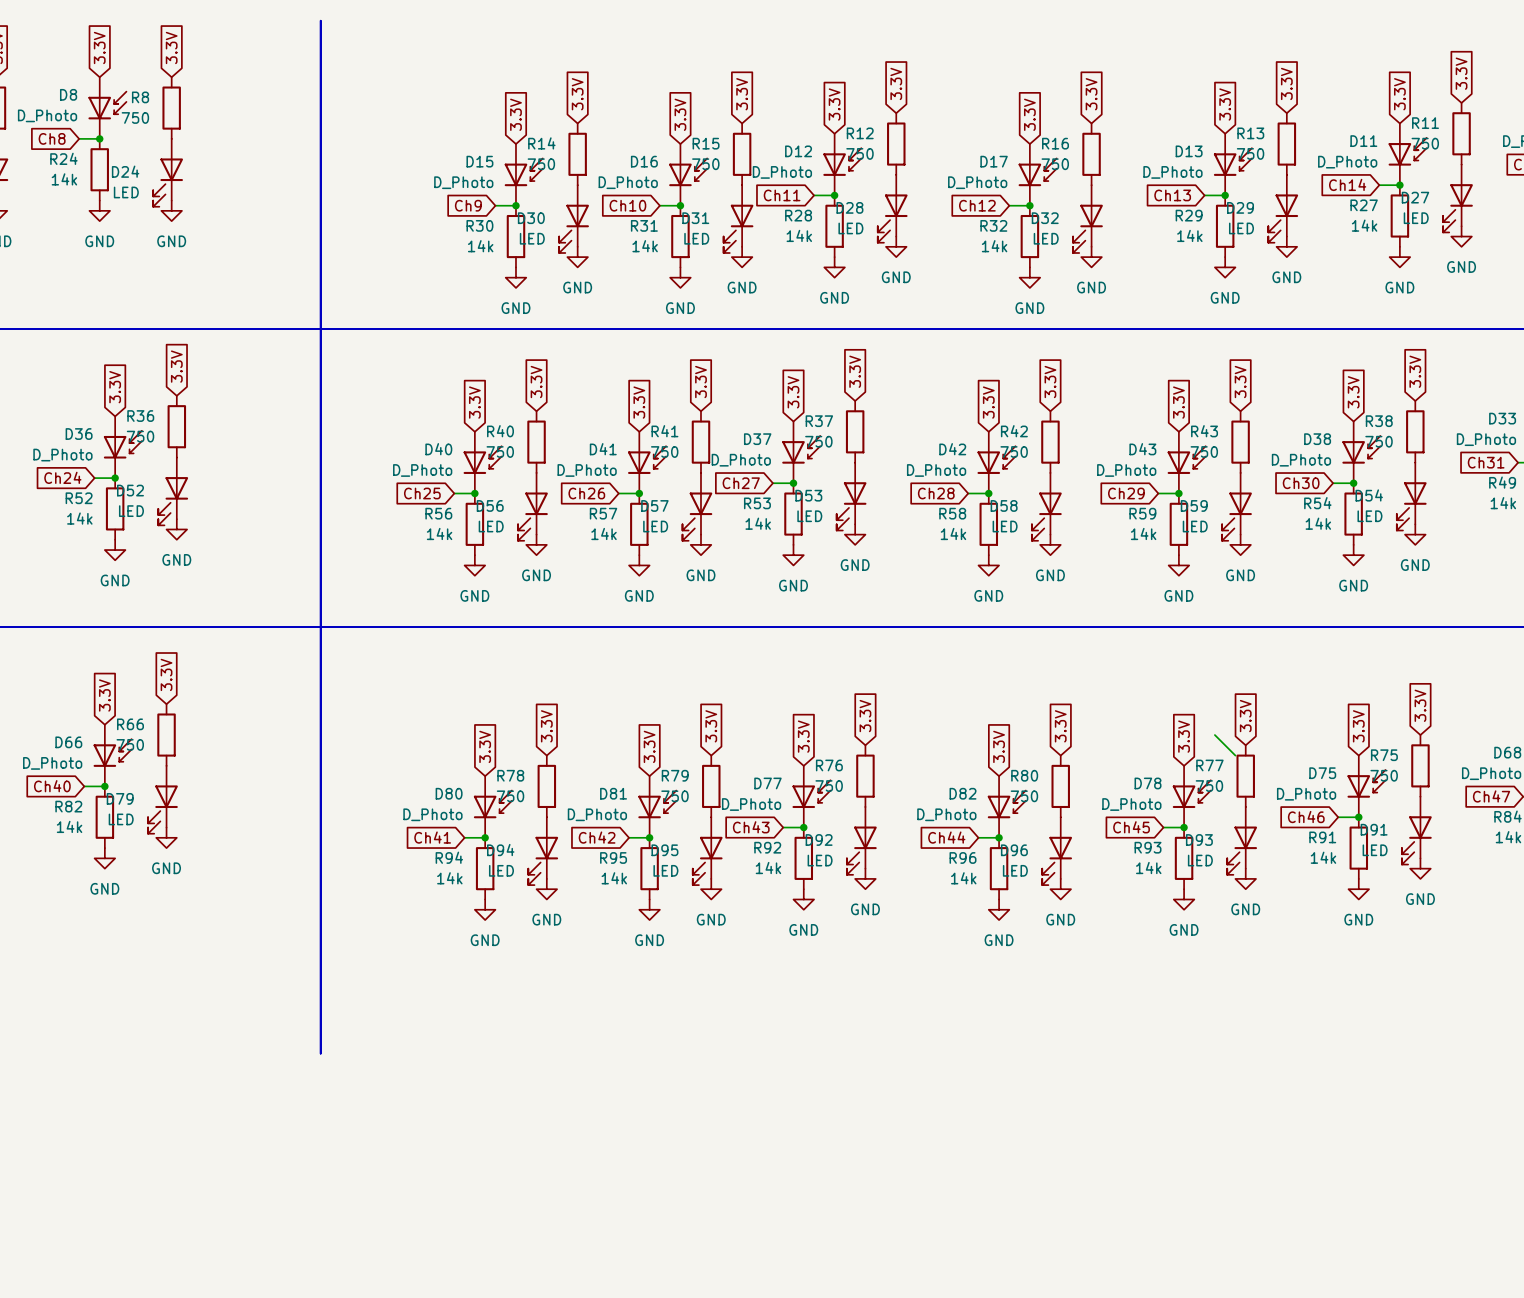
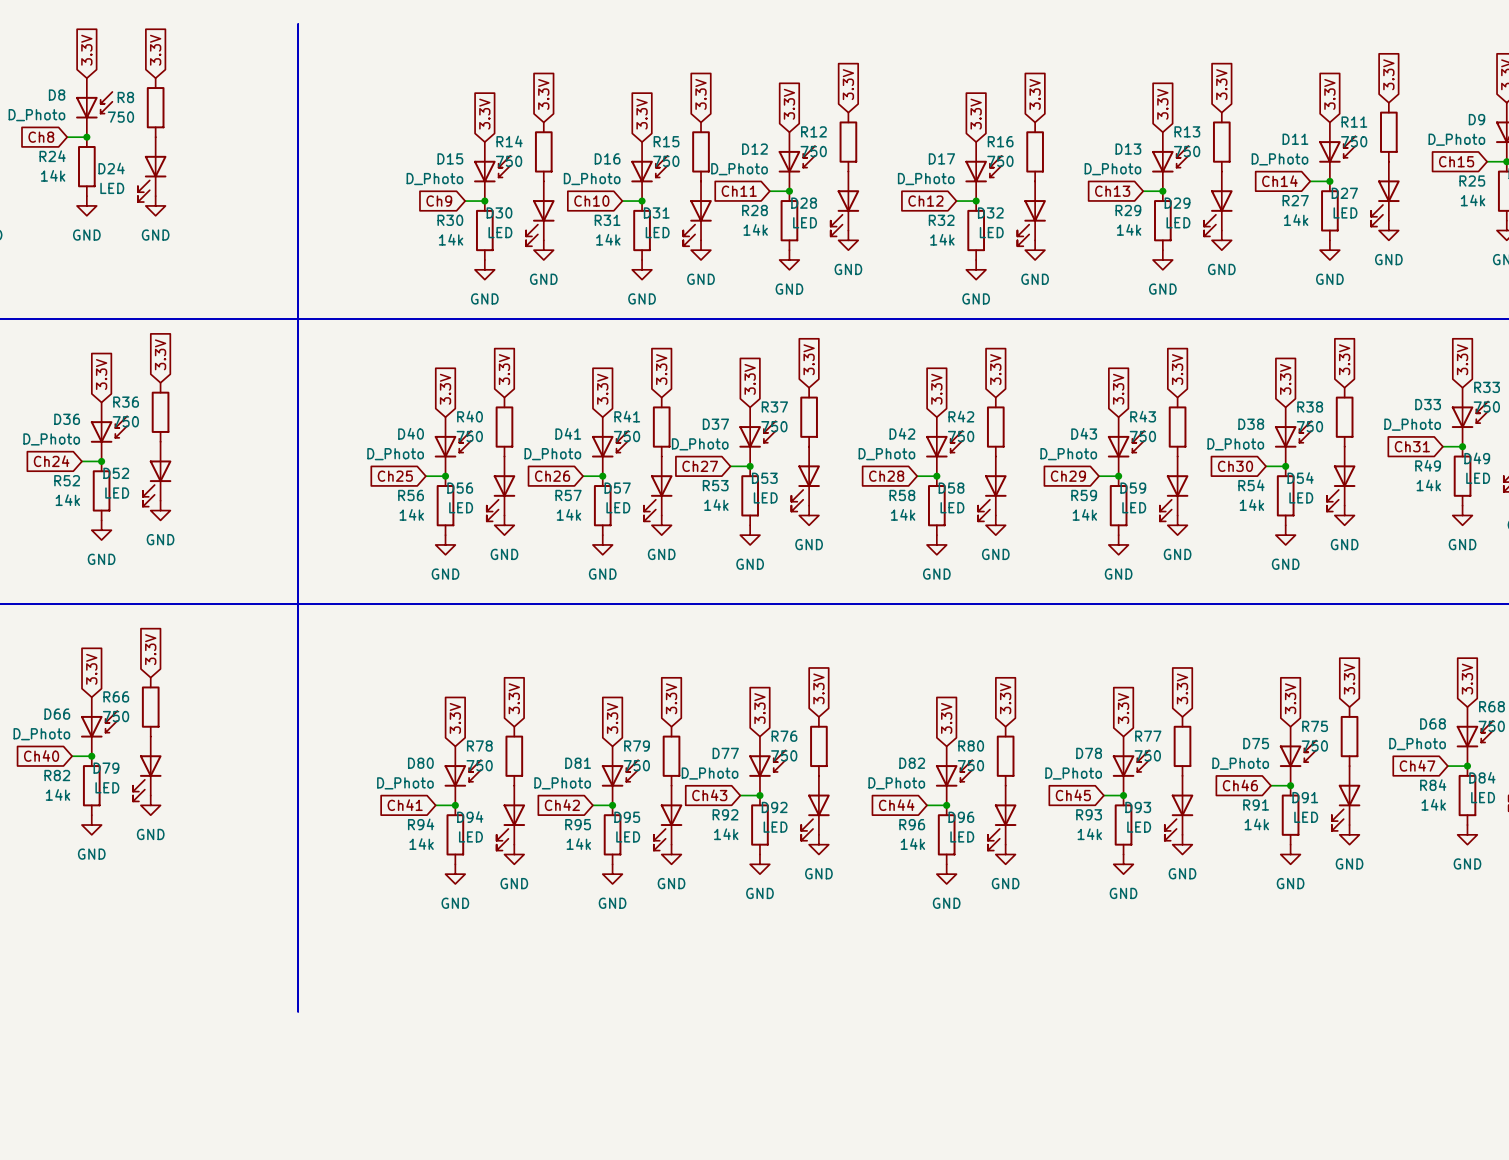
wire: (1214, 735) (1235, 755) -> none

